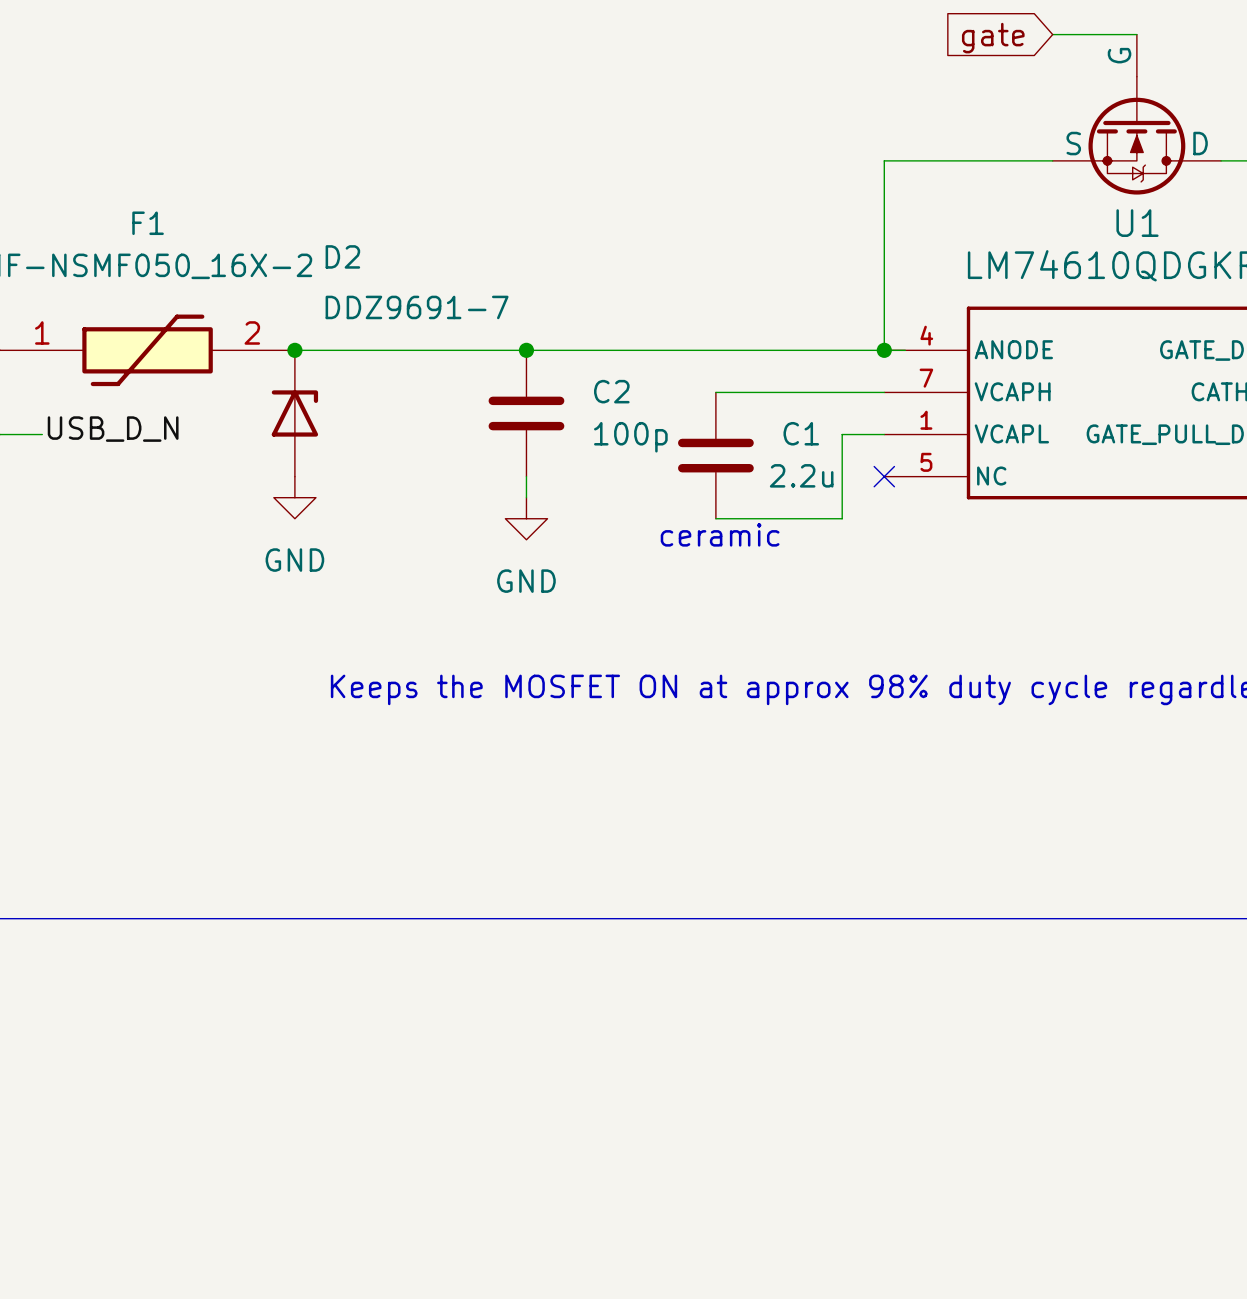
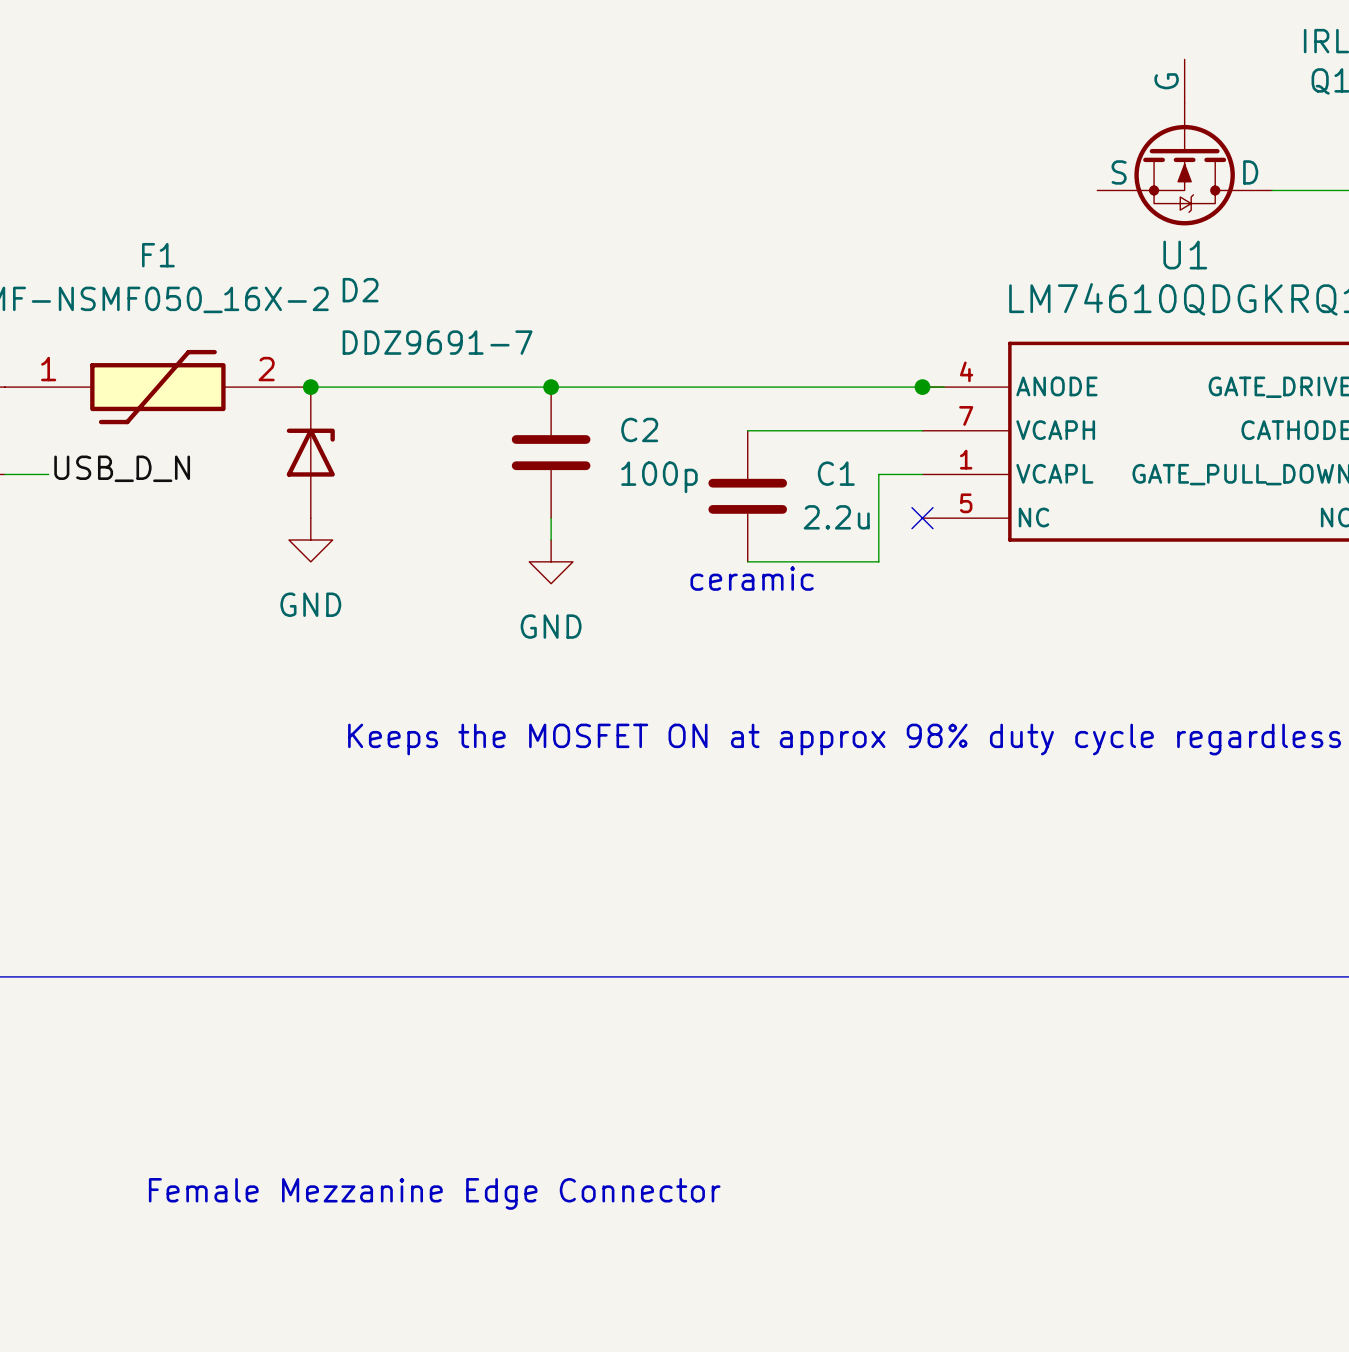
wire: (1052, 34) (1136, 34) -> none
global label: gate (993, 38) -> none
wire: (1052, 160) (884, 160) (884, 350) -> none
text: none -> Female Mezzanine Edge Connector (434, 1193)

